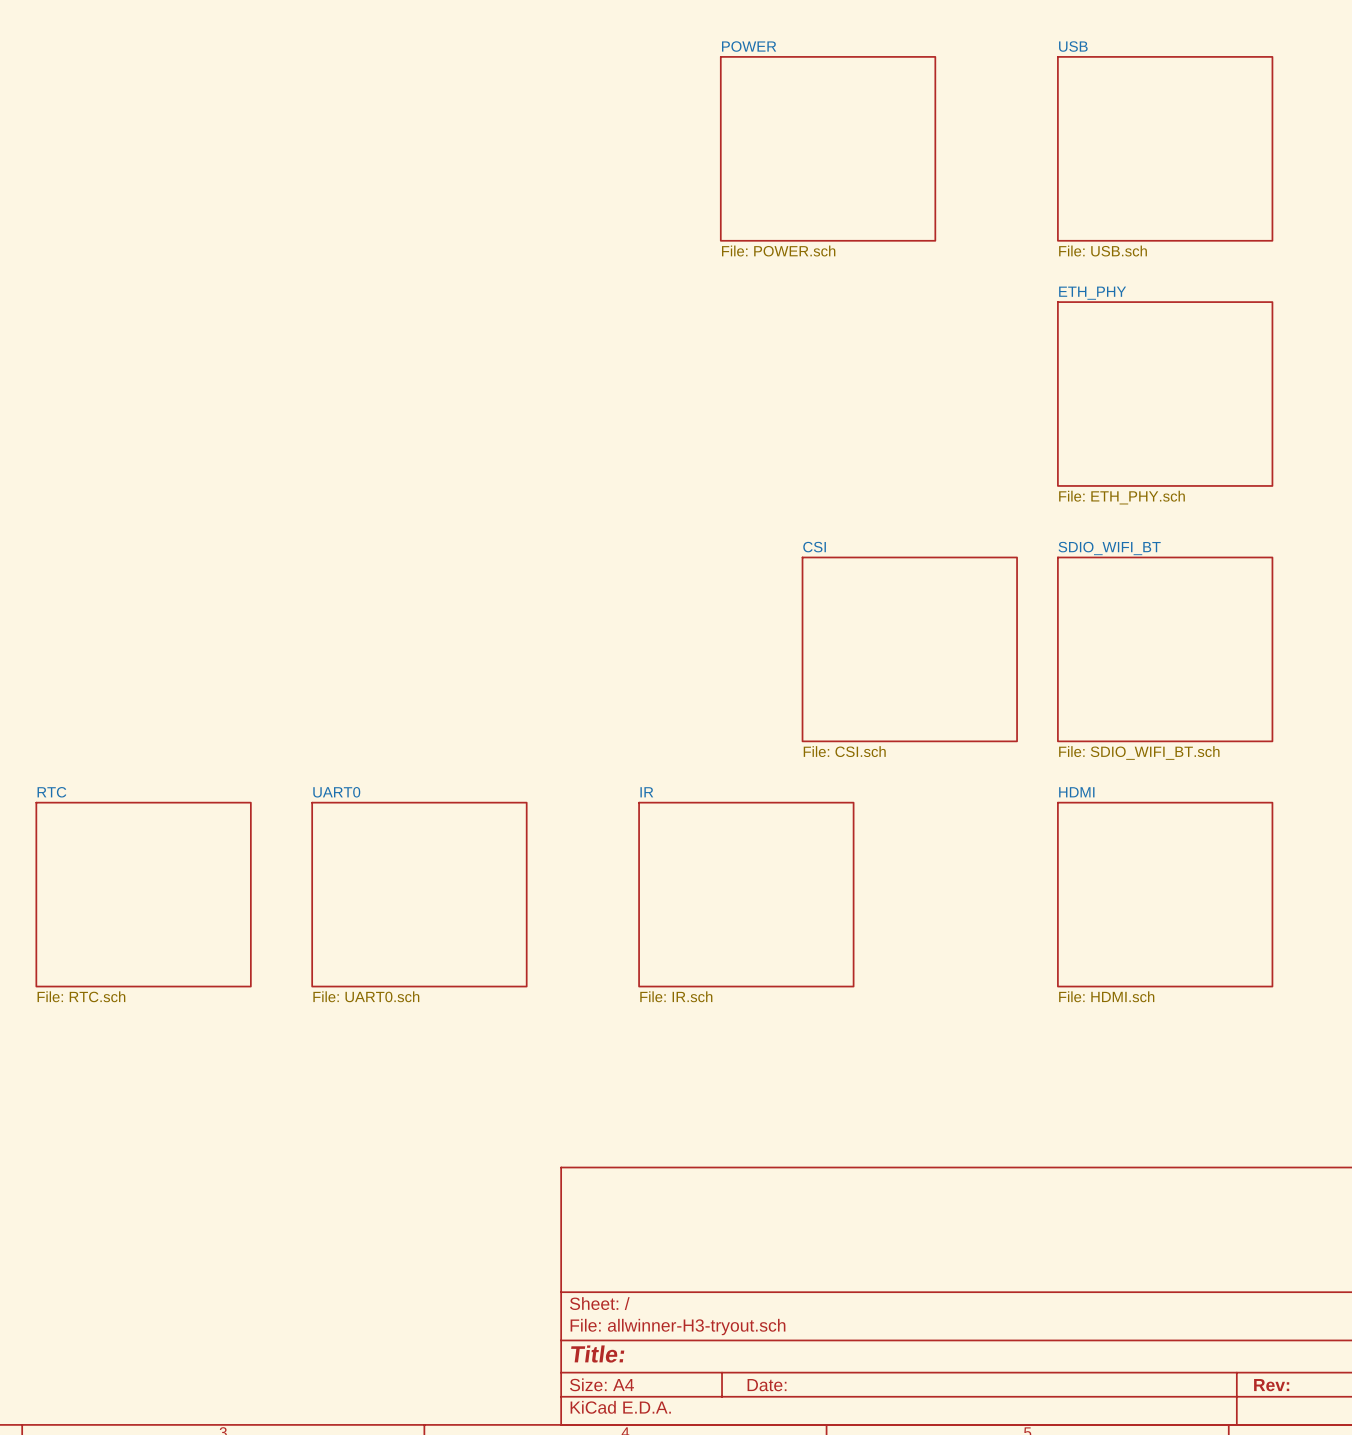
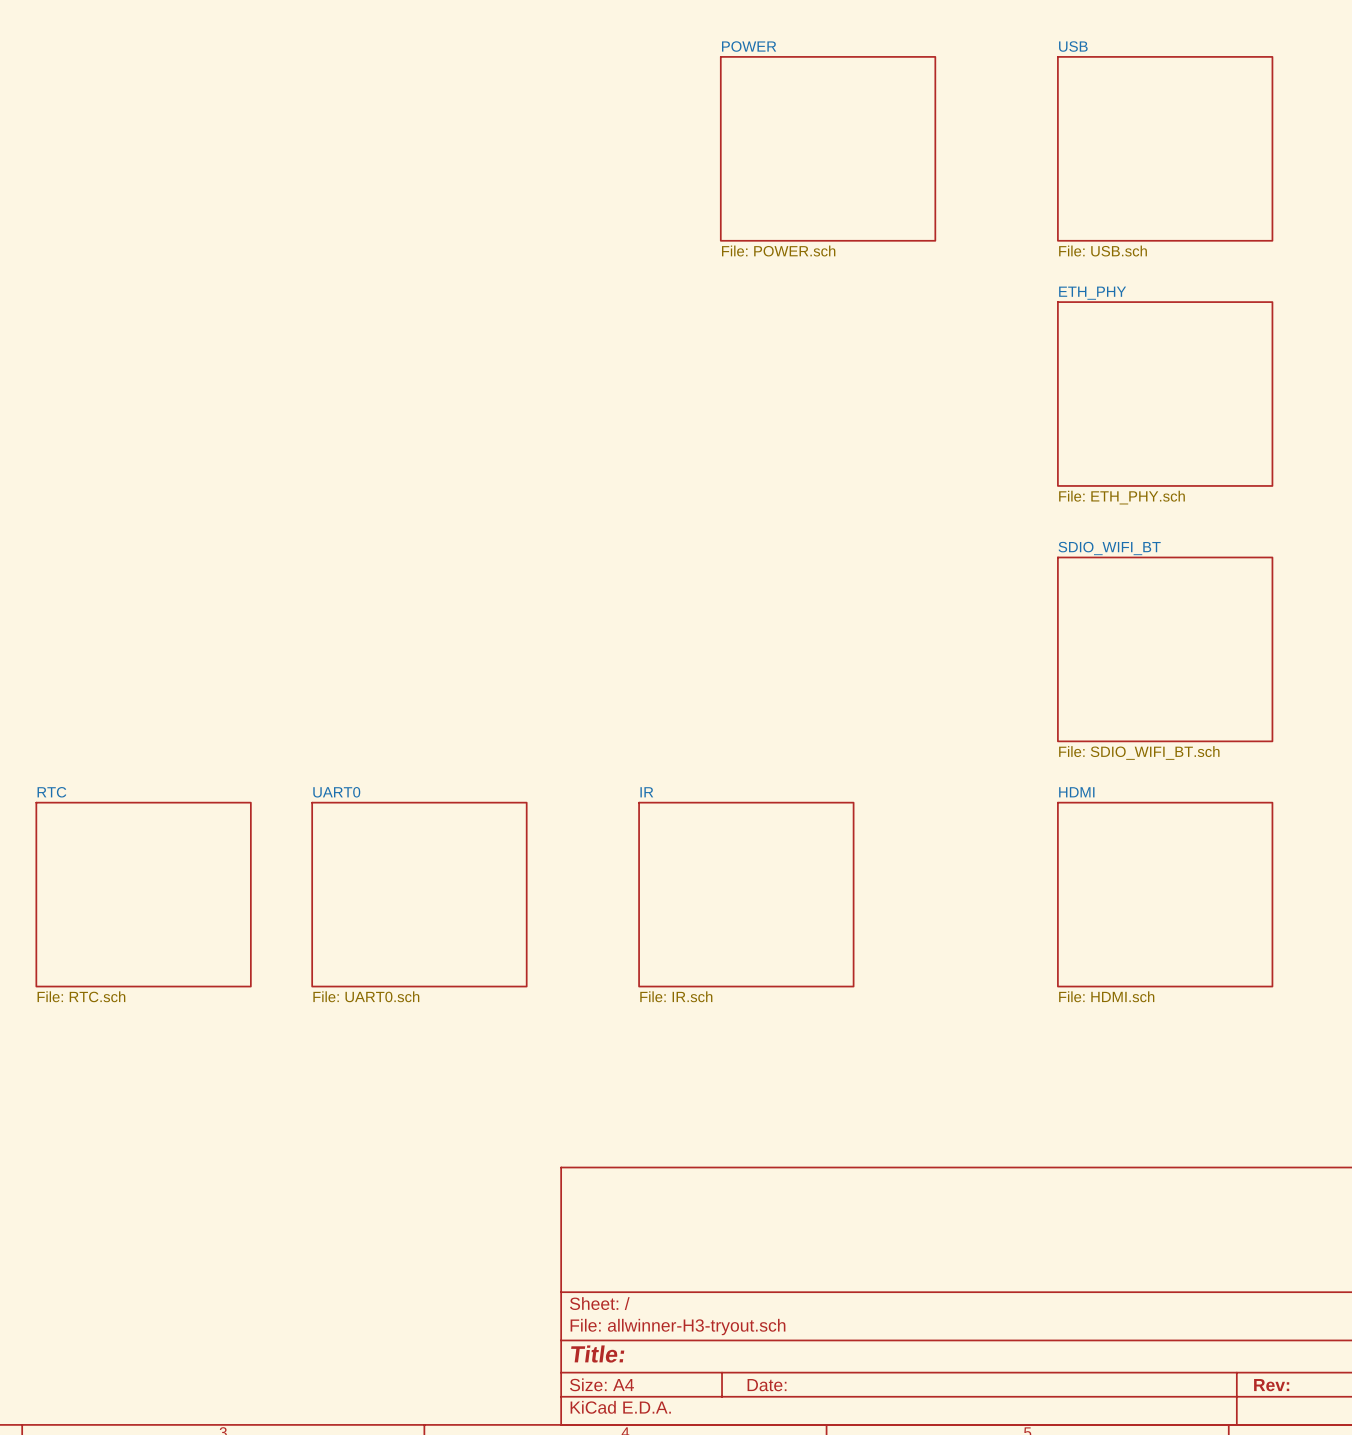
sheet CSI: File: CSI.sch (909, 649) -> none

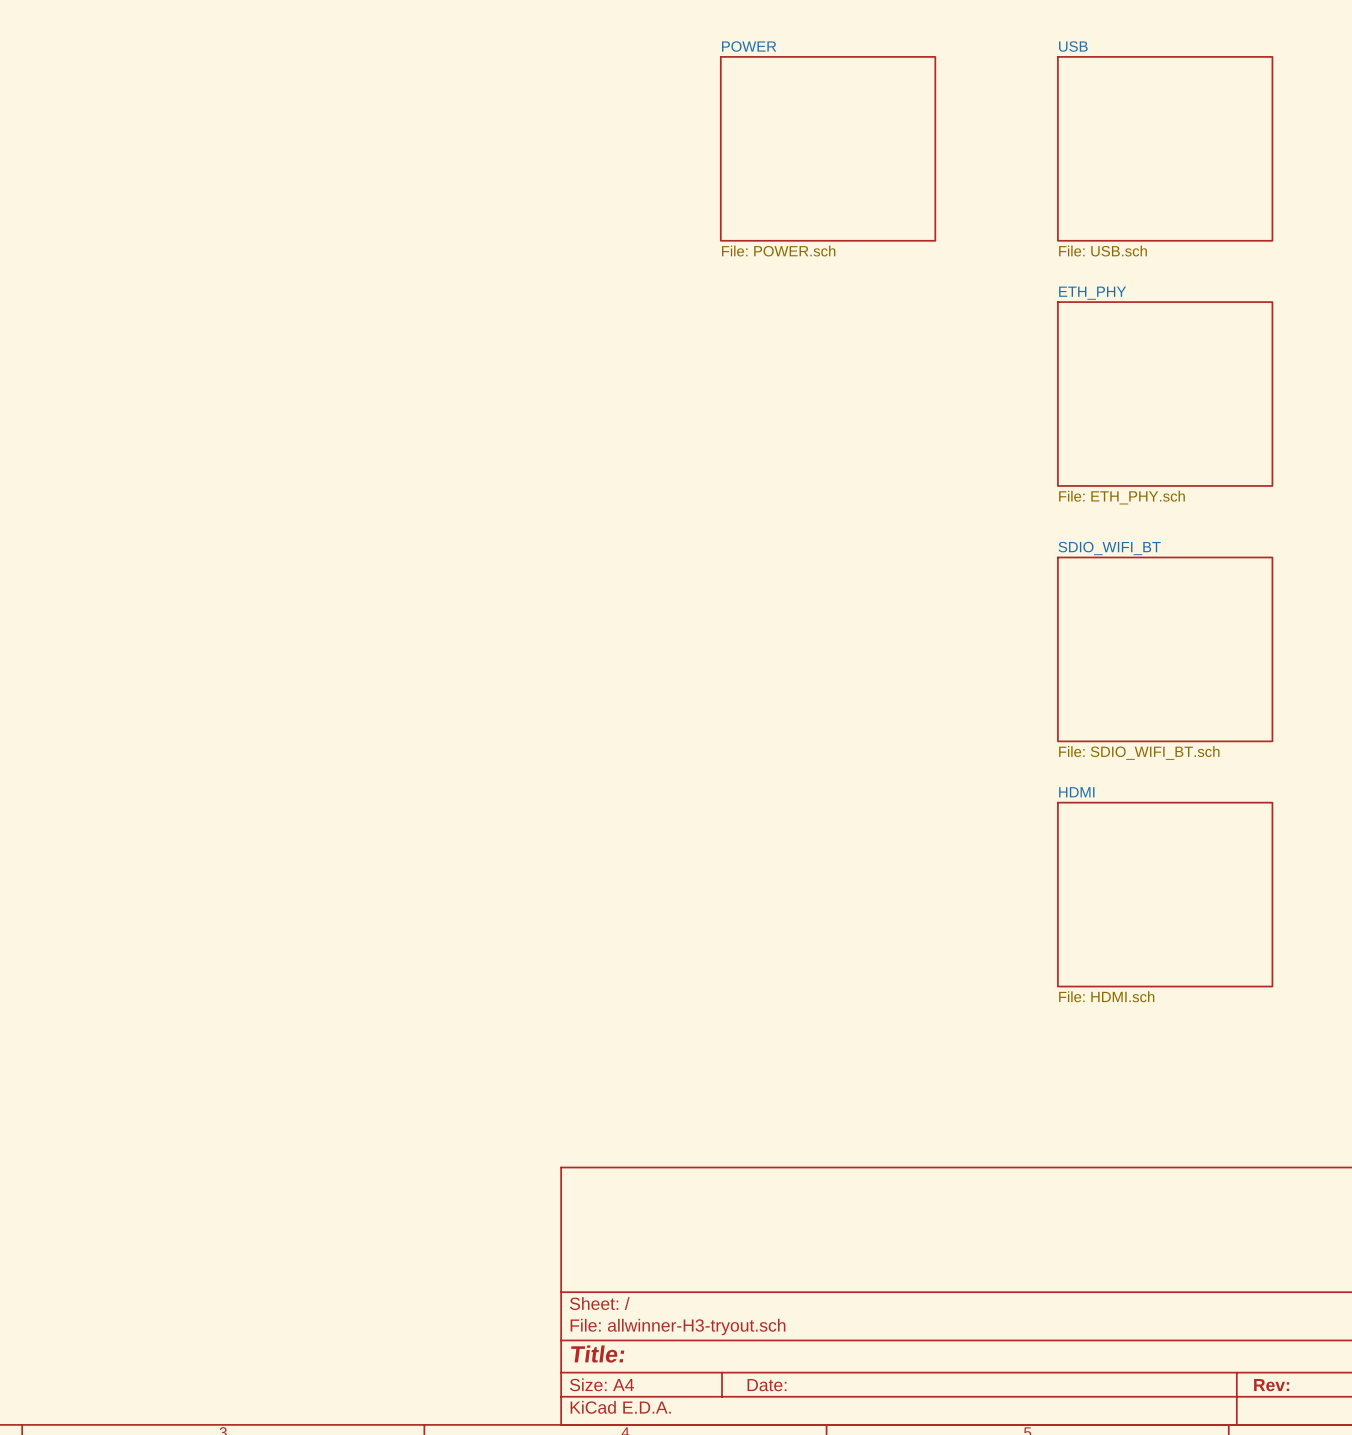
sheet RTC: File: RTC.sch (143, 894) -> none
sheet UART0: File: UART0.sch (419, 894) -> none
sheet IR: File: IR.sch (746, 894) -> none

